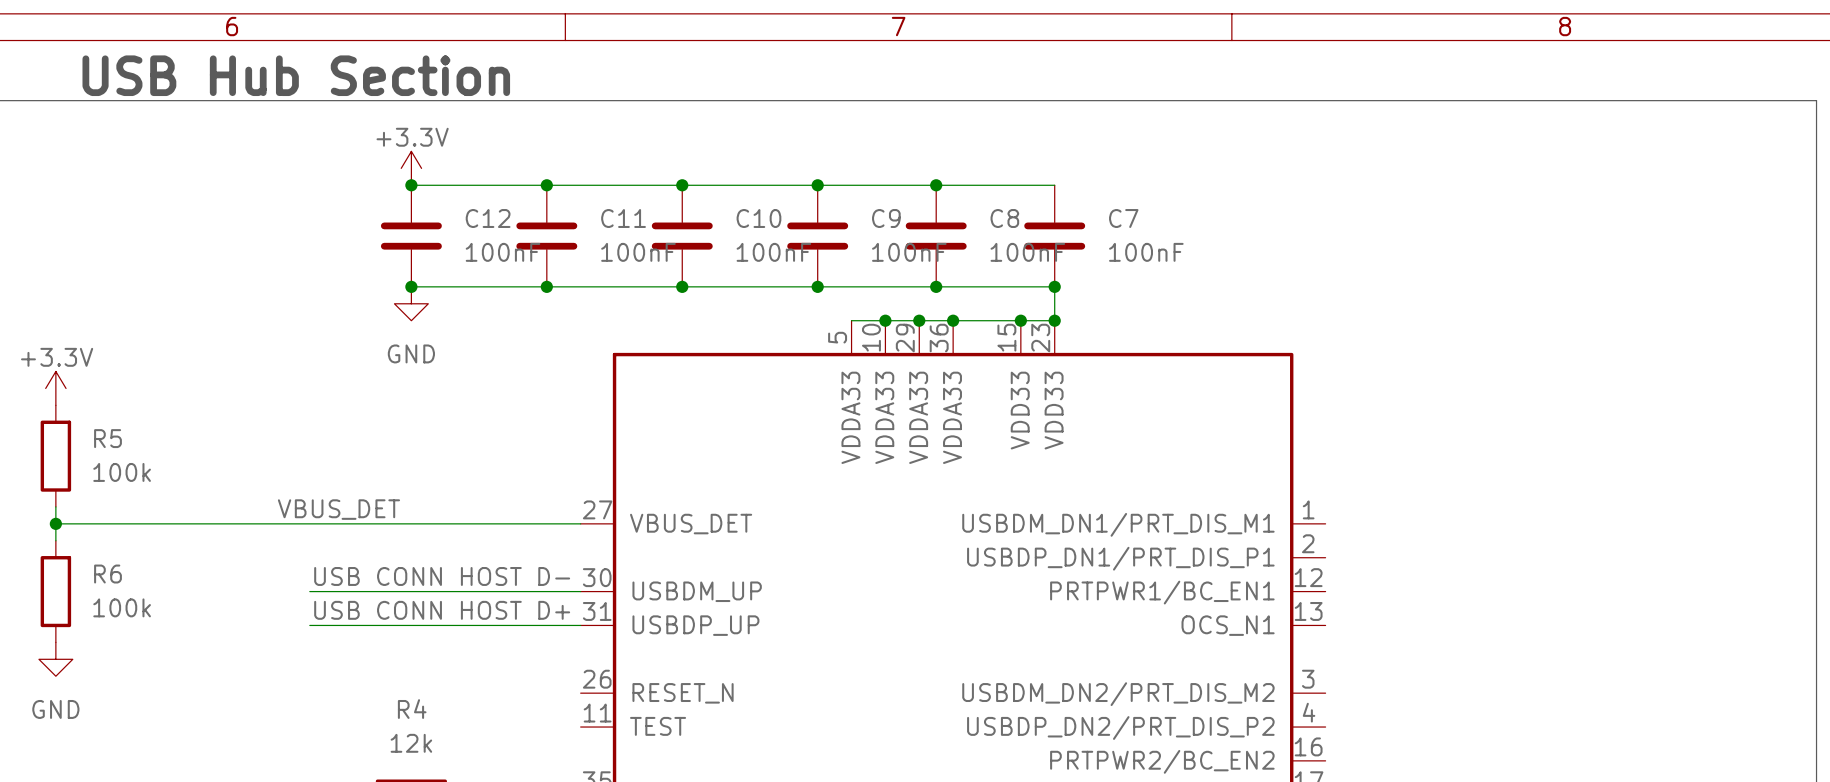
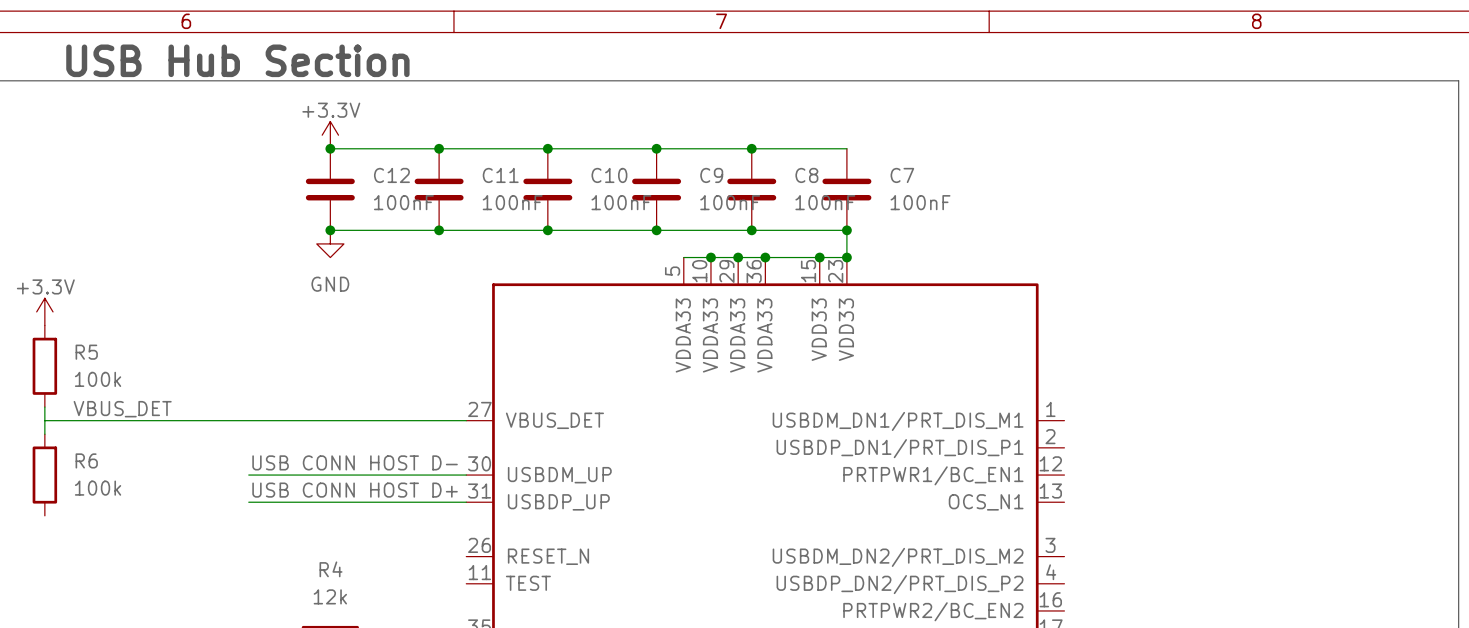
label position: VBUS_DET (338, 509) -> VBUS_DET (122, 409)
junction: (55, 523) -> none
power symbol: GND (55, 659) -> none

